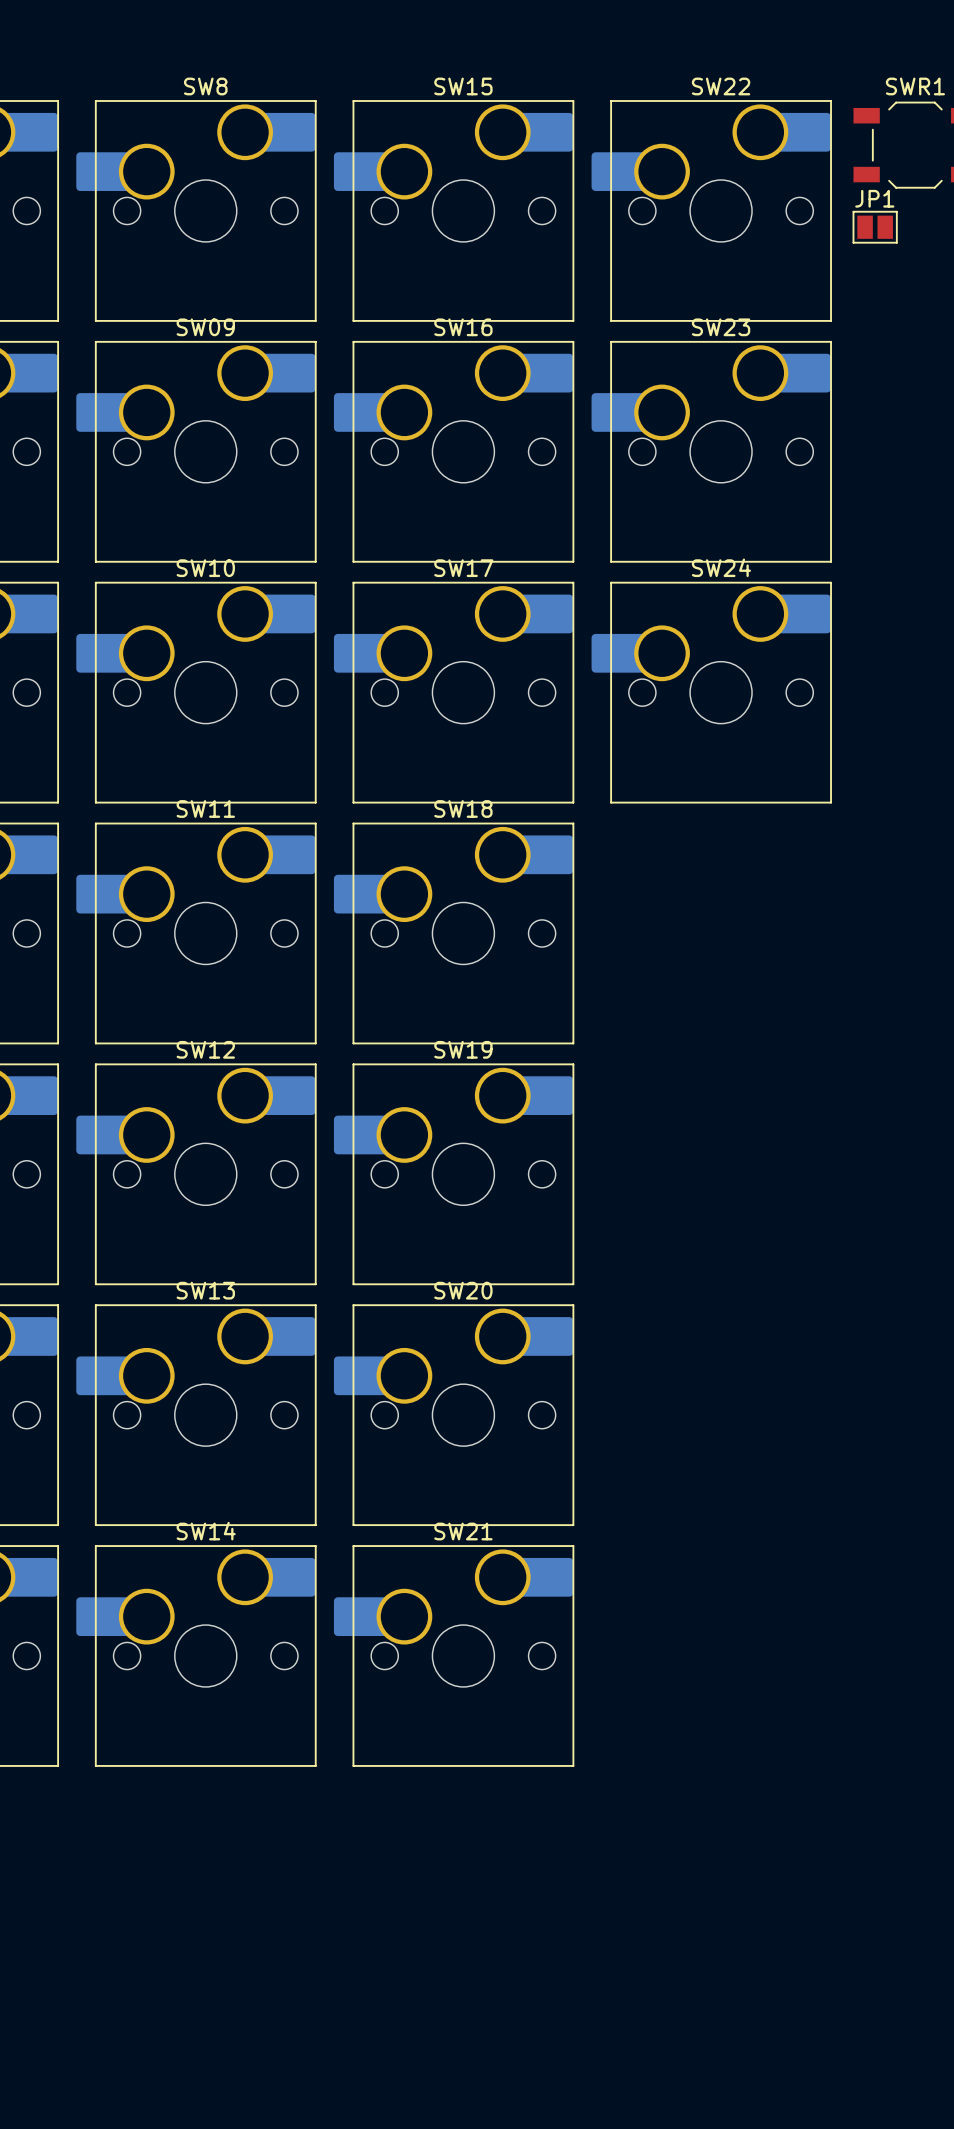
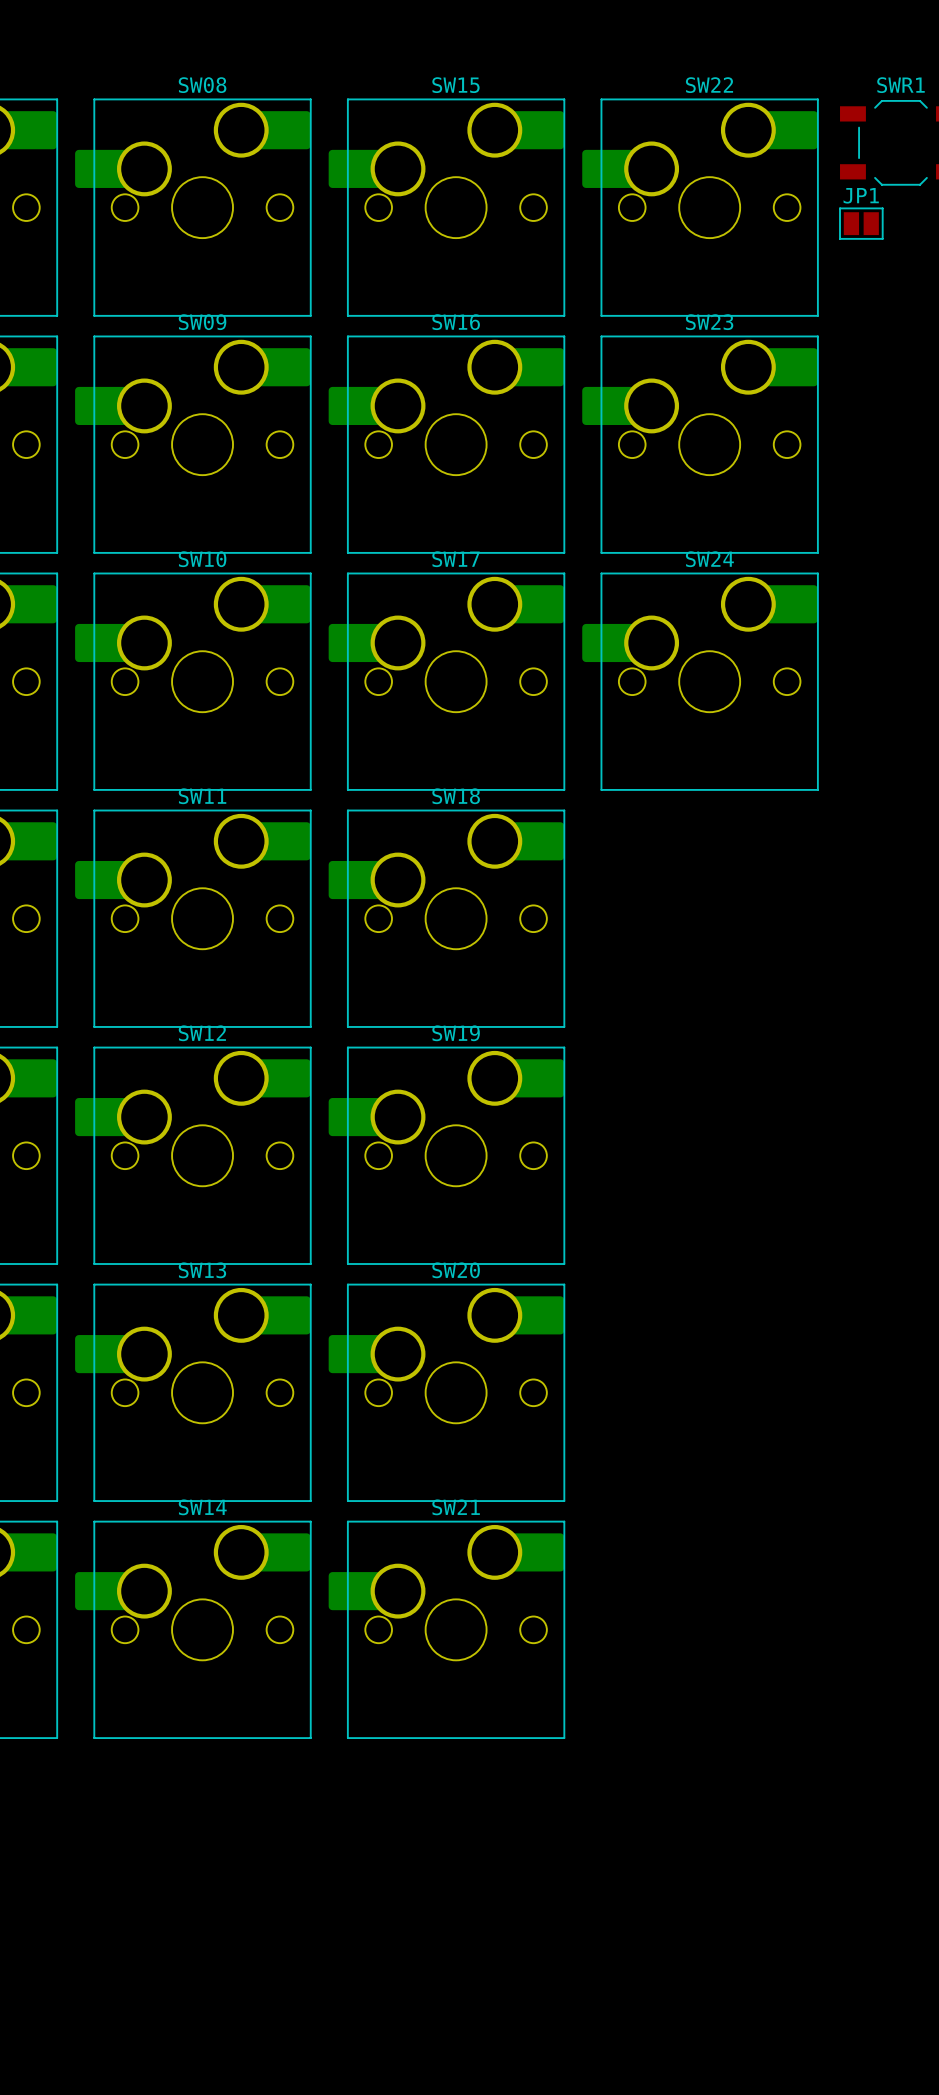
SW8 name: SW8 (205, 86) -> SW08 (202, 85)

